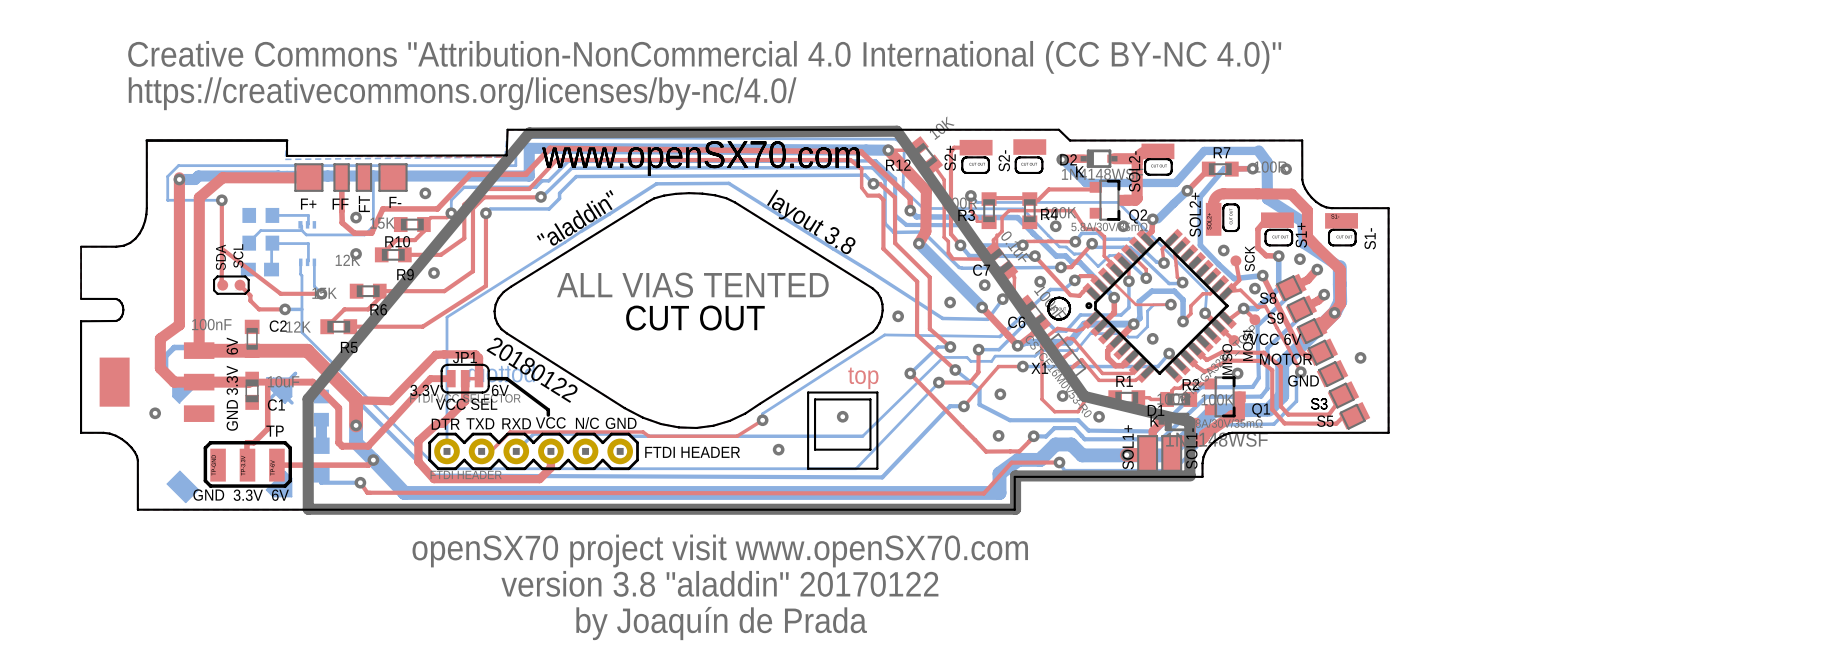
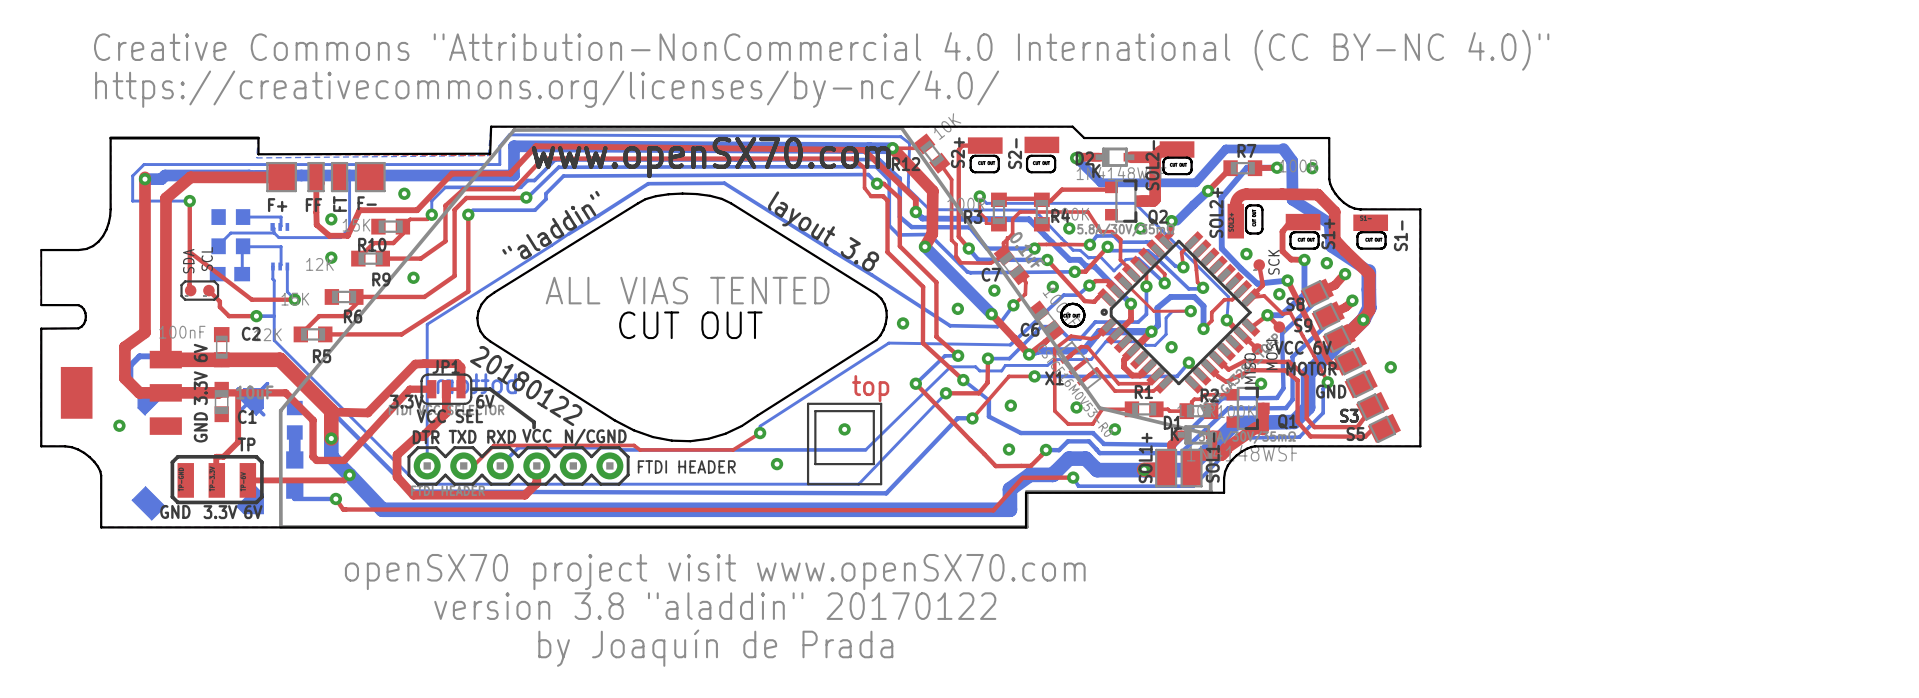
line width: thick (1189, 474) (1189, 421) (1084, 396) (897, 131) (529, 132) (308, 399) (308, 509) (1015, 509) (1015, 475) (1190, 475) -> thin (1210, 490) (1210, 434) (1099, 407) (901, 128) (514, 130) (280, 410) (280, 526) (1026, 526) (1026, 491) (1211, 491)

